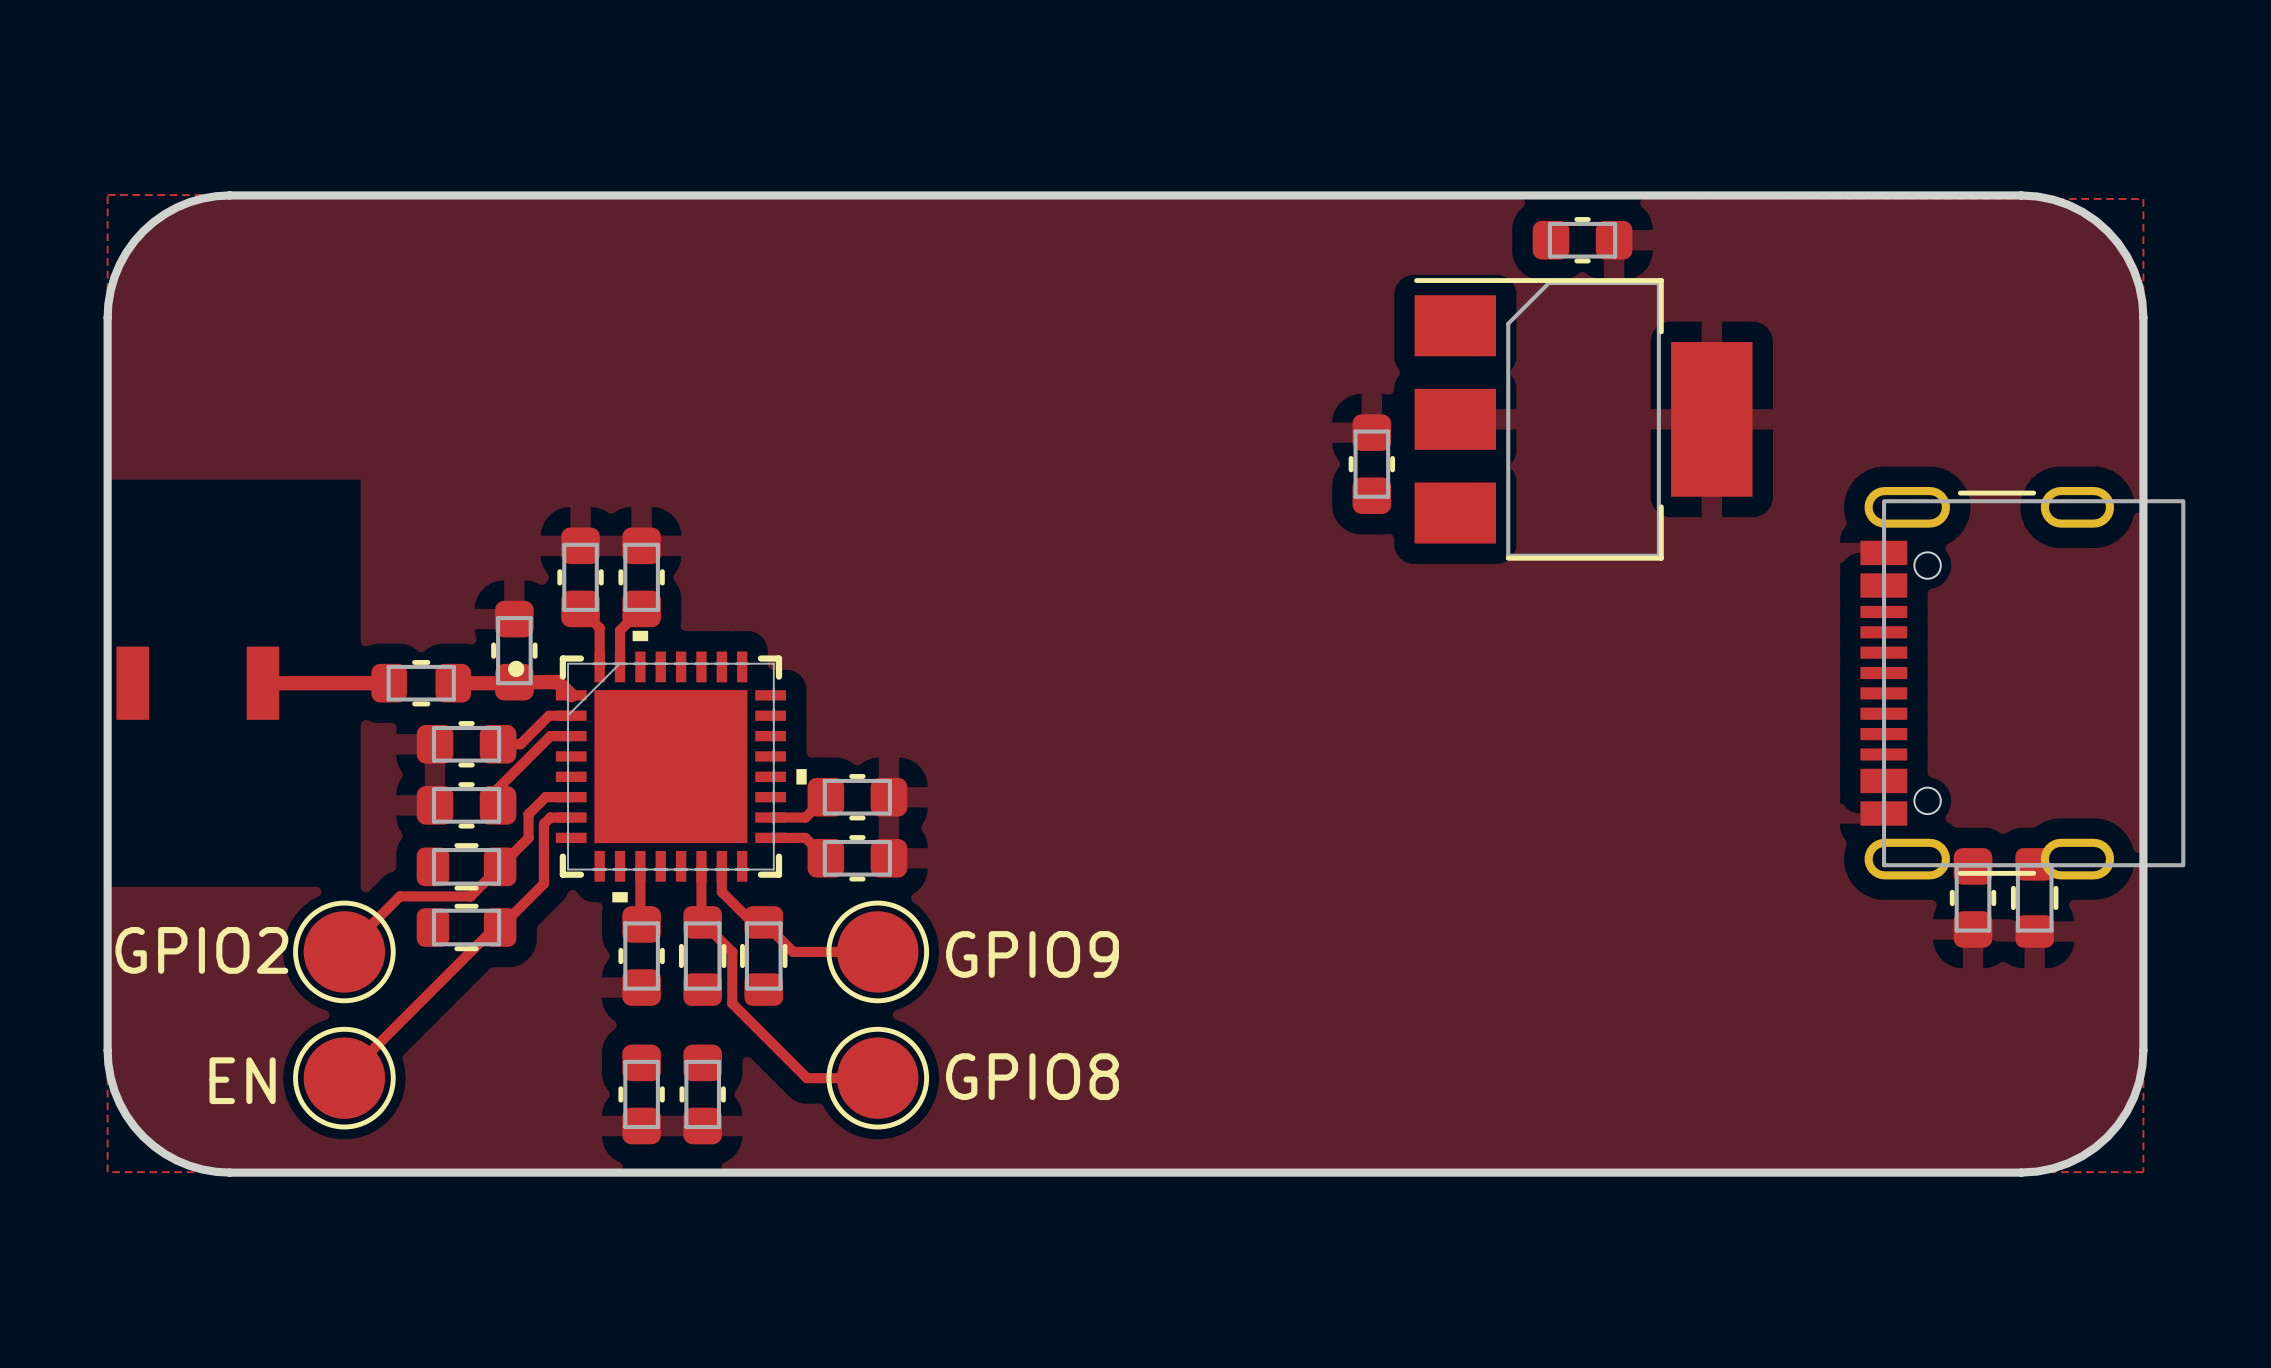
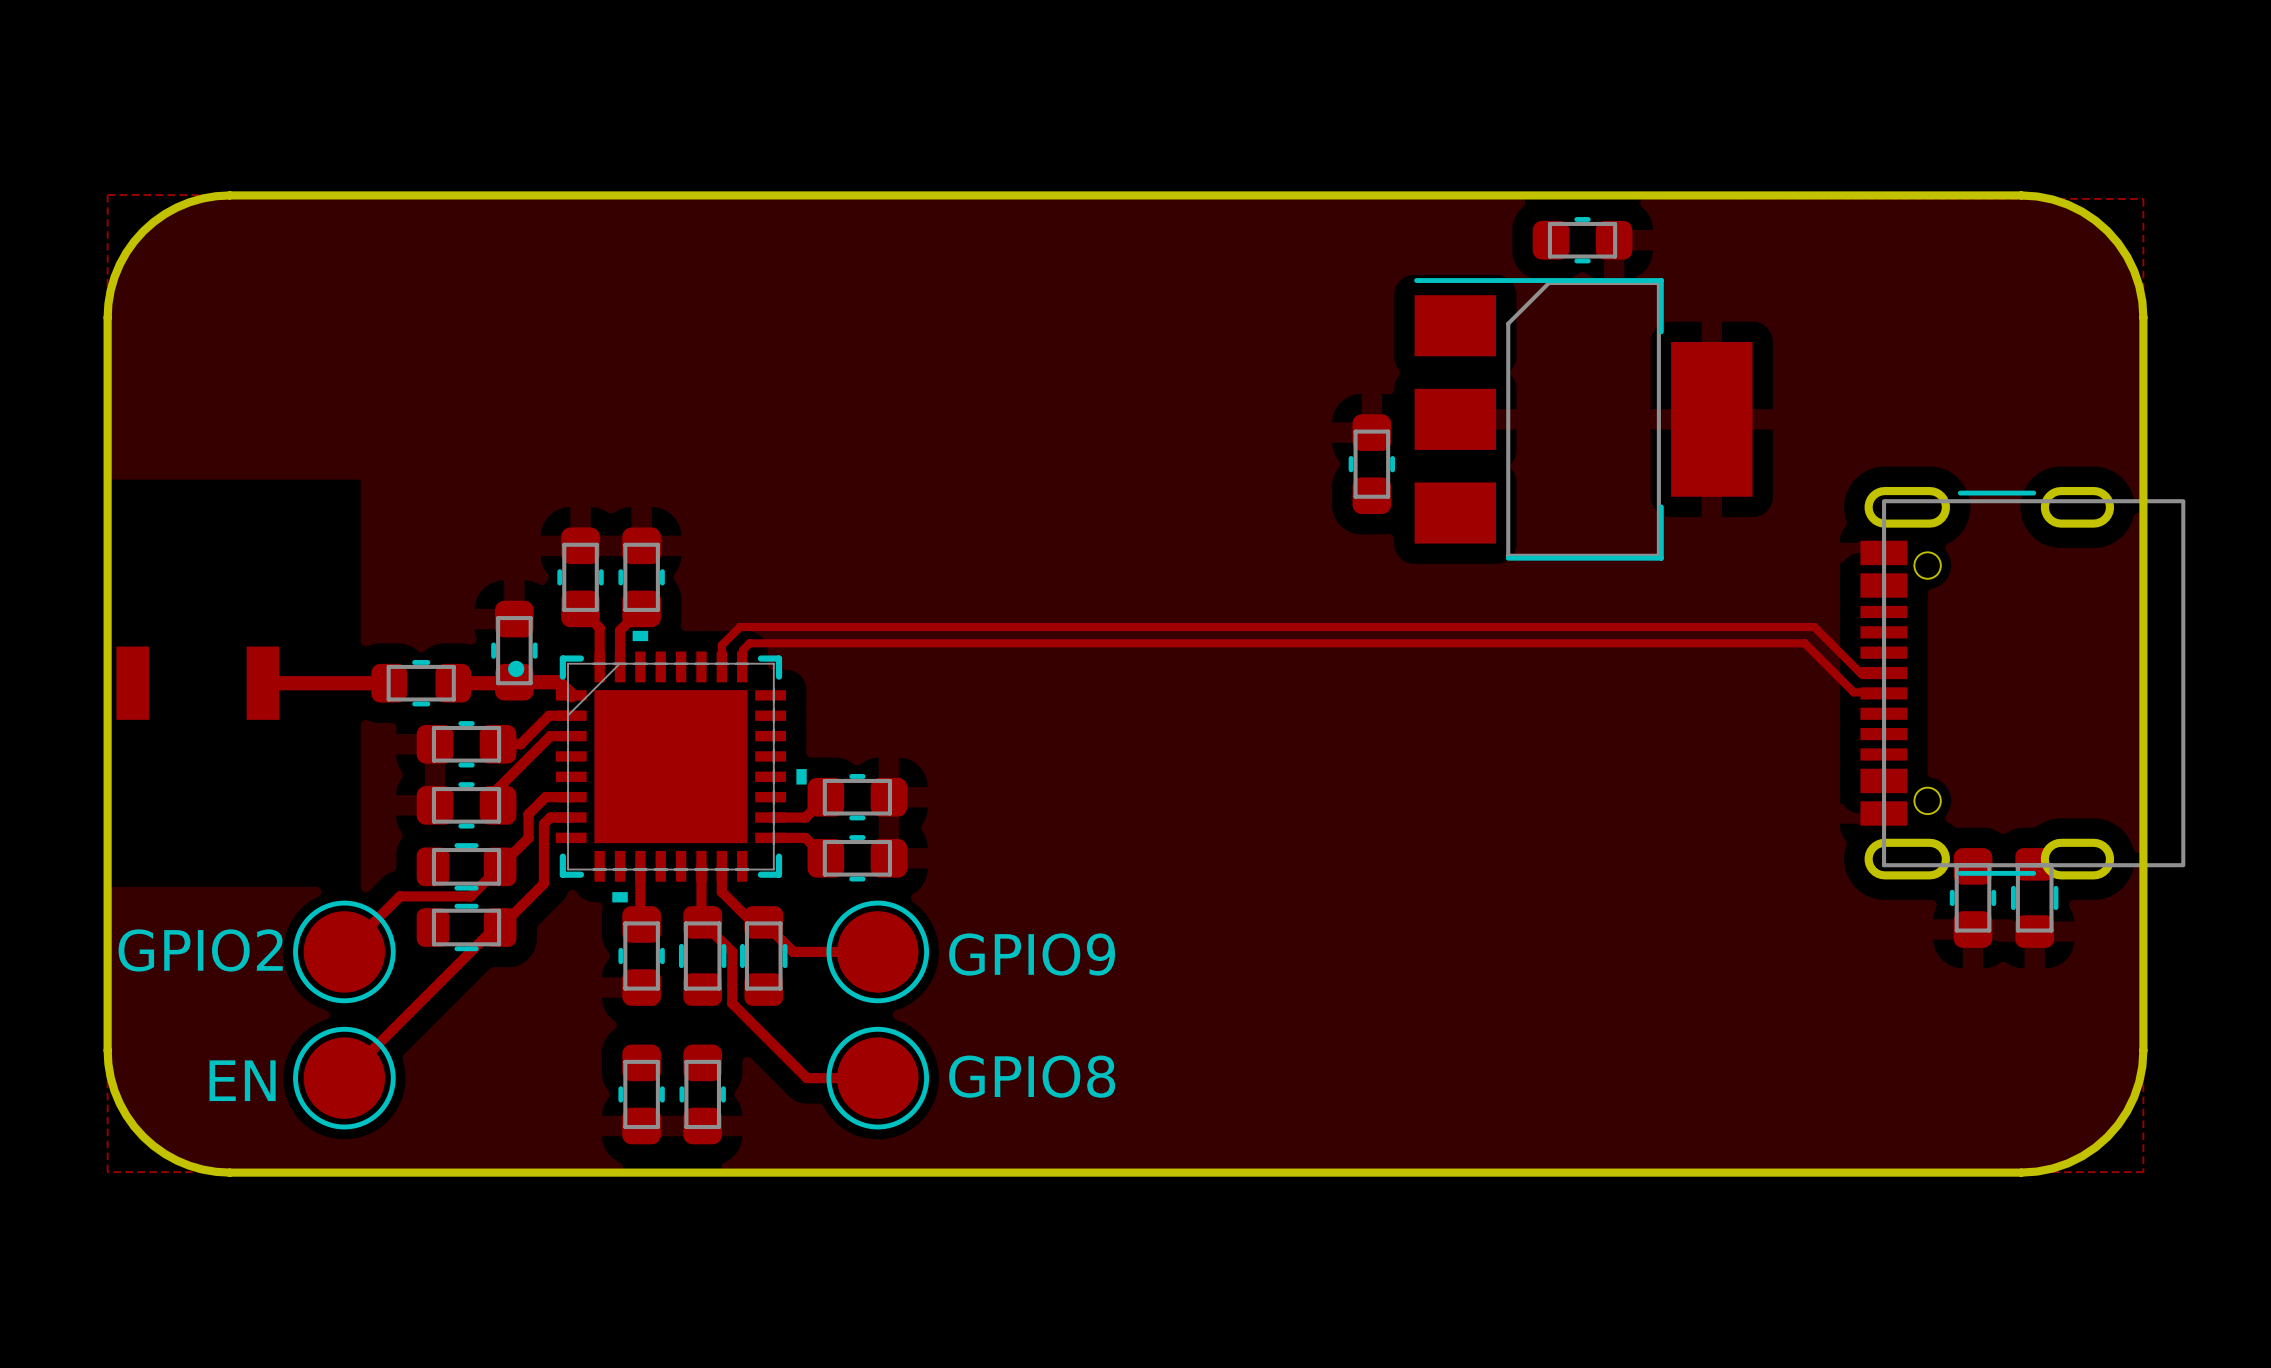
track: none -> (721, 666) (721, 645) (740, 627) (1814, 627) (1861, 674) (1883, 673)
track: none -> (742, 666) (742, 650) (749, 643) (1804, 643) (1853, 692) (1883, 693)

